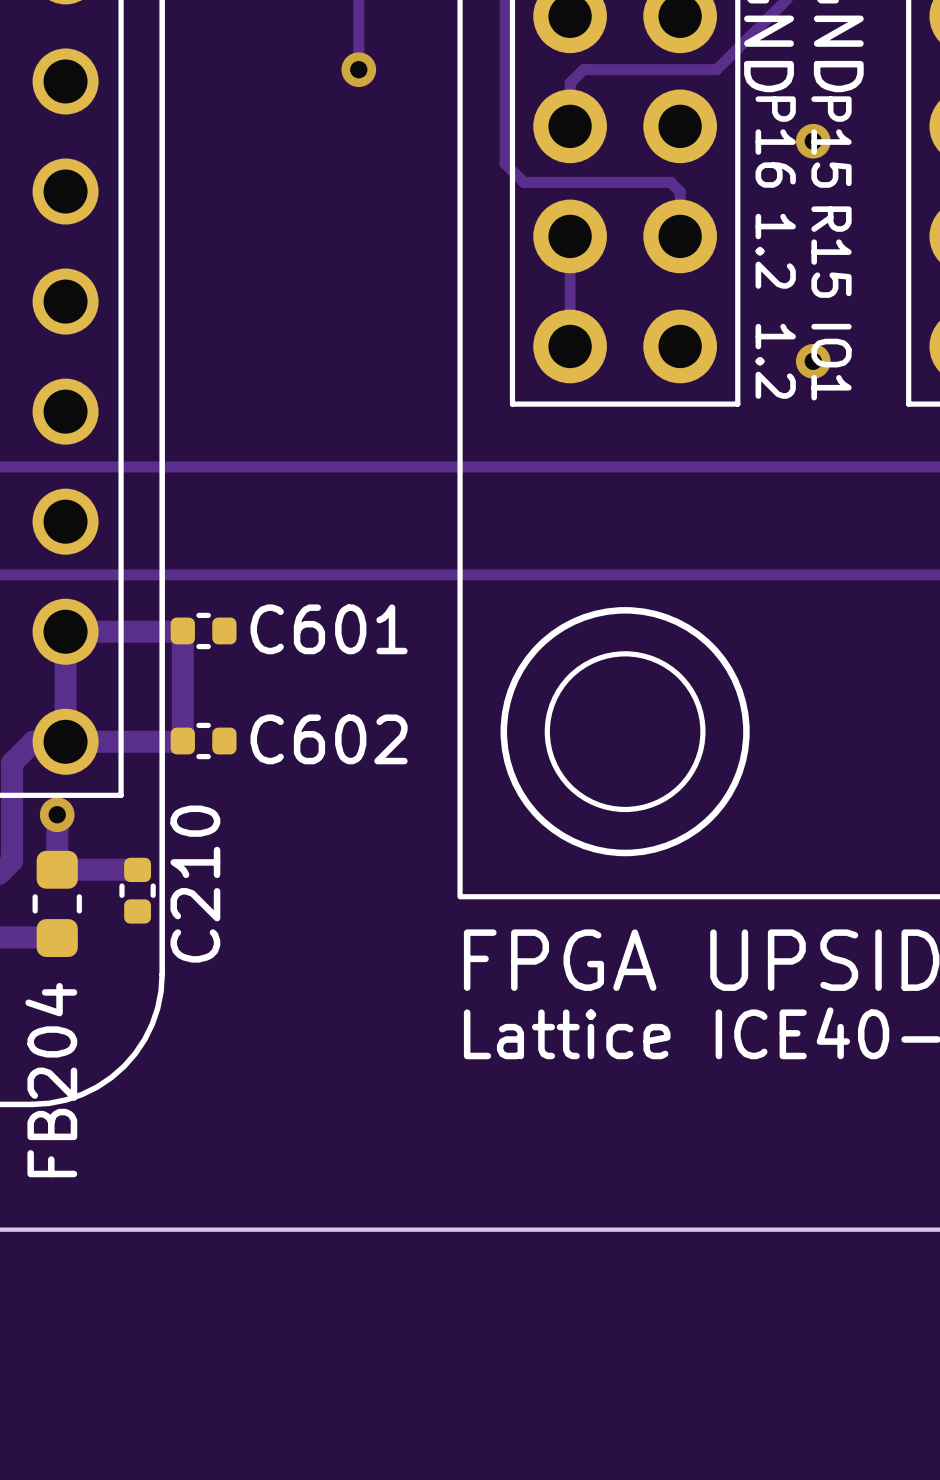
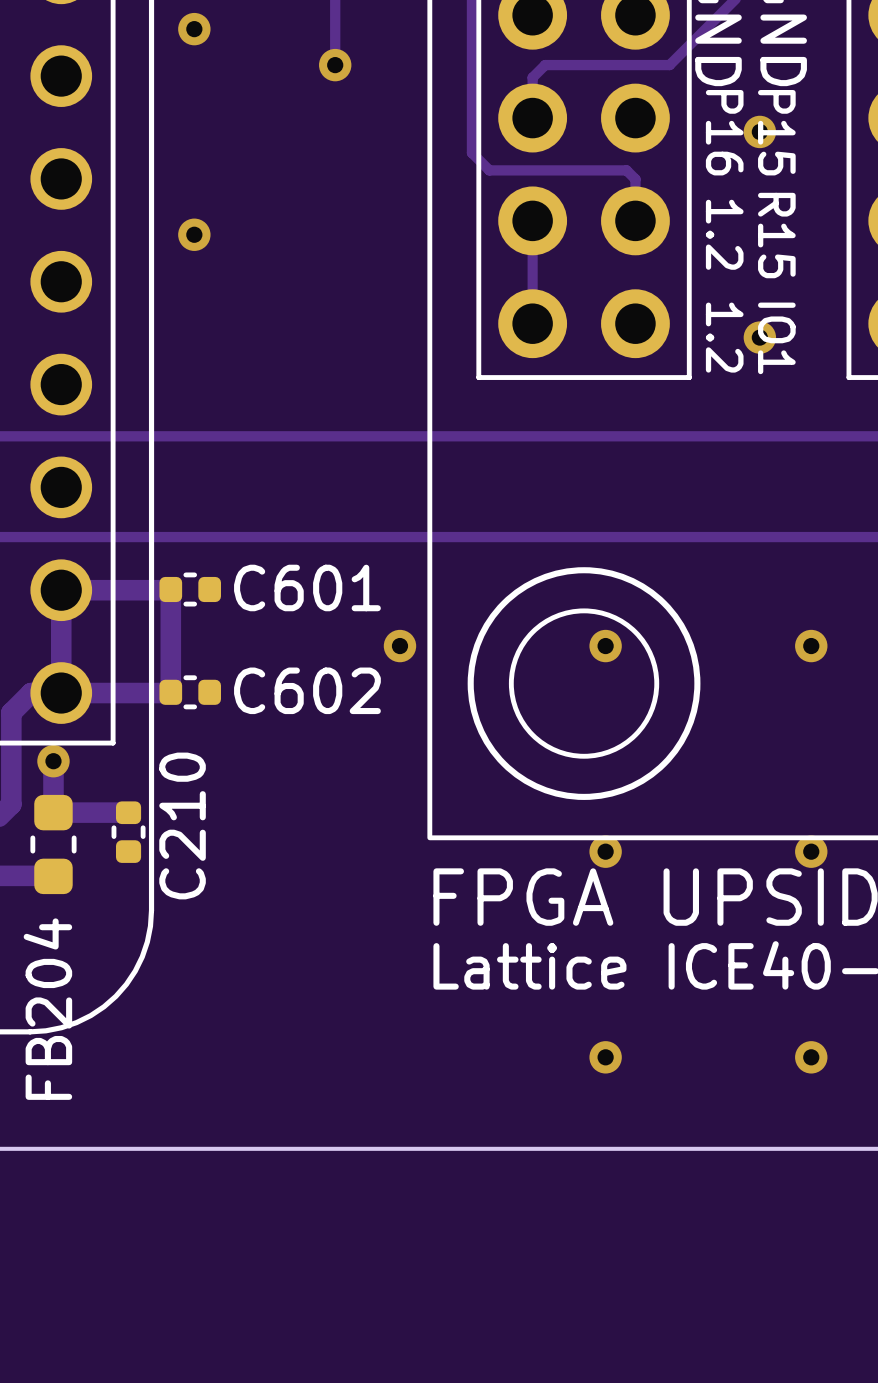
via: none -> (194, 29)
via: none -> (194, 234)
via: none -> (399, 646)
via: none -> (605, 646)
via: none -> (811, 646)
via: none -> (605, 851)
via: none -> (811, 851)
via: none -> (605, 1057)
via: none -> (811, 1057)

